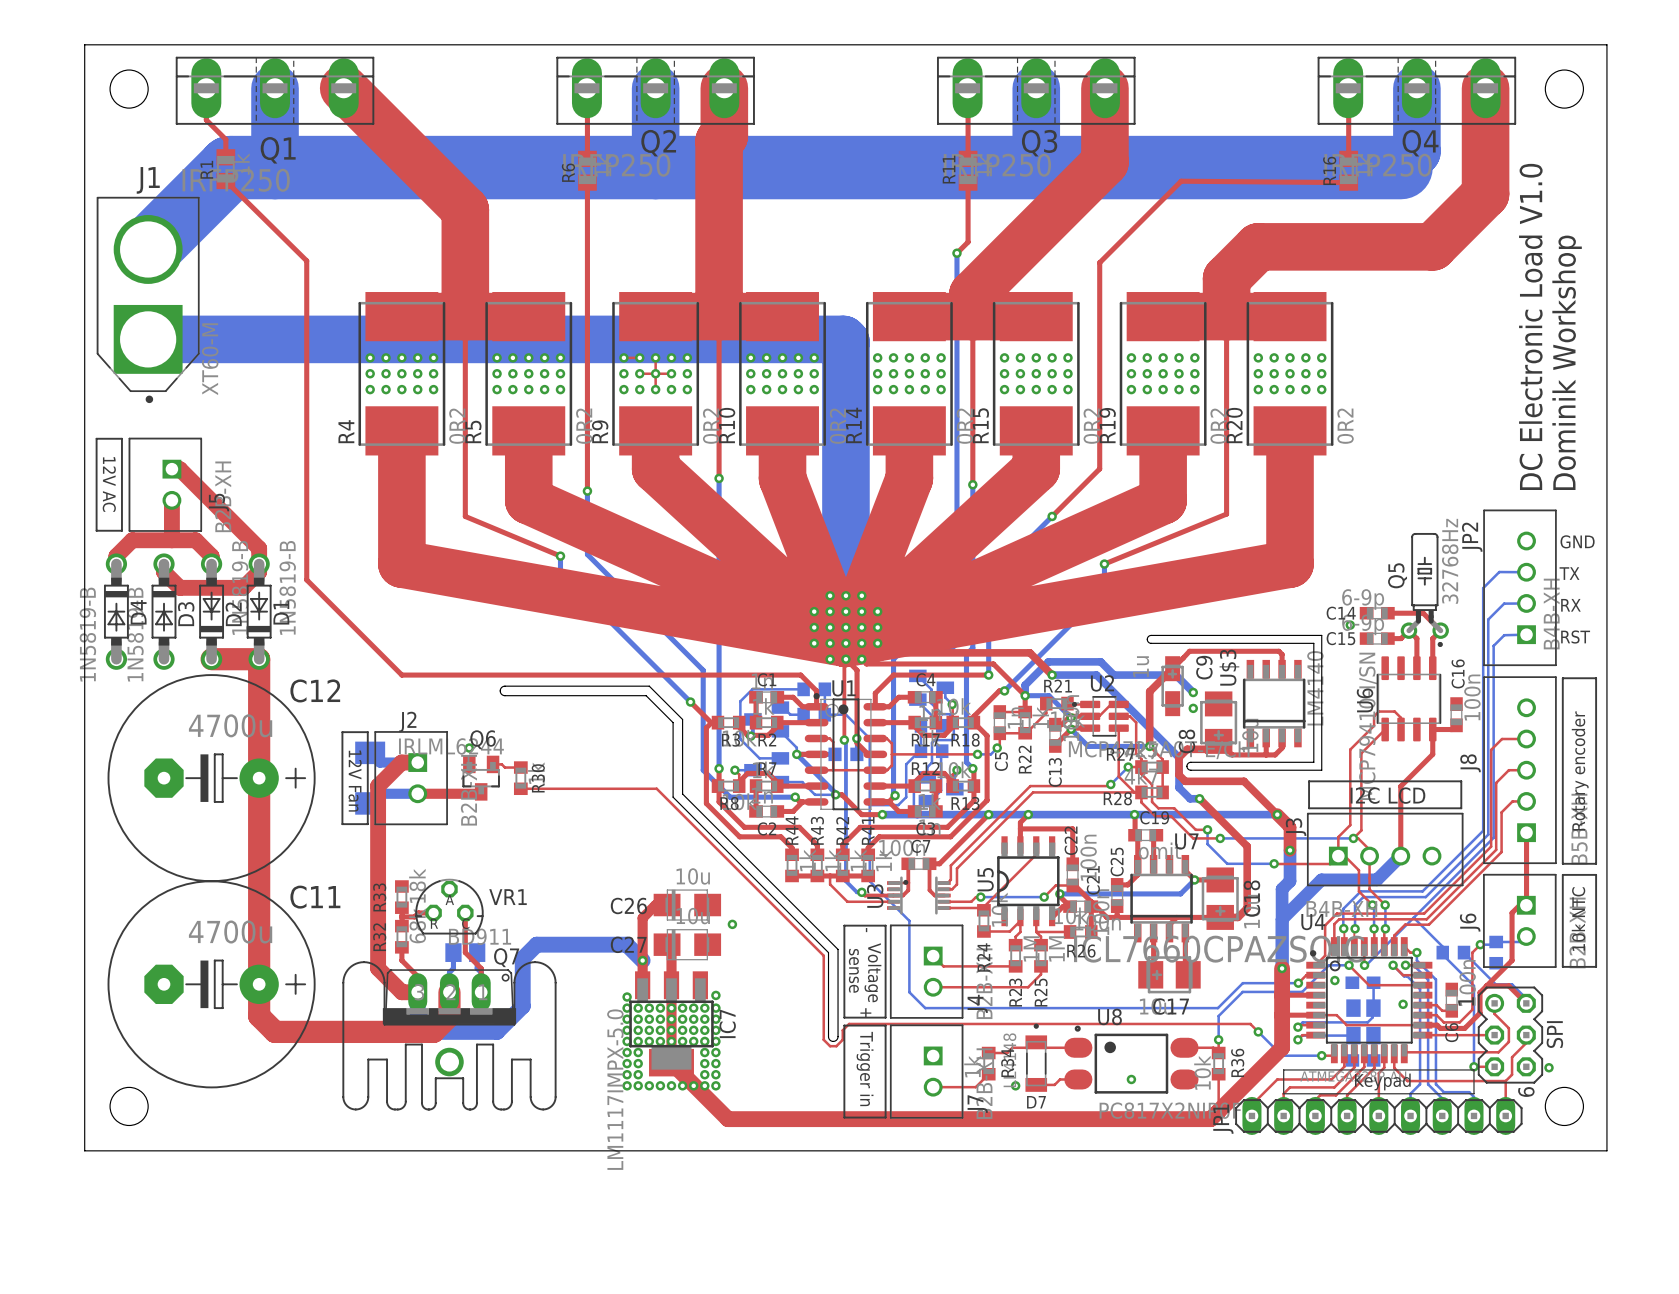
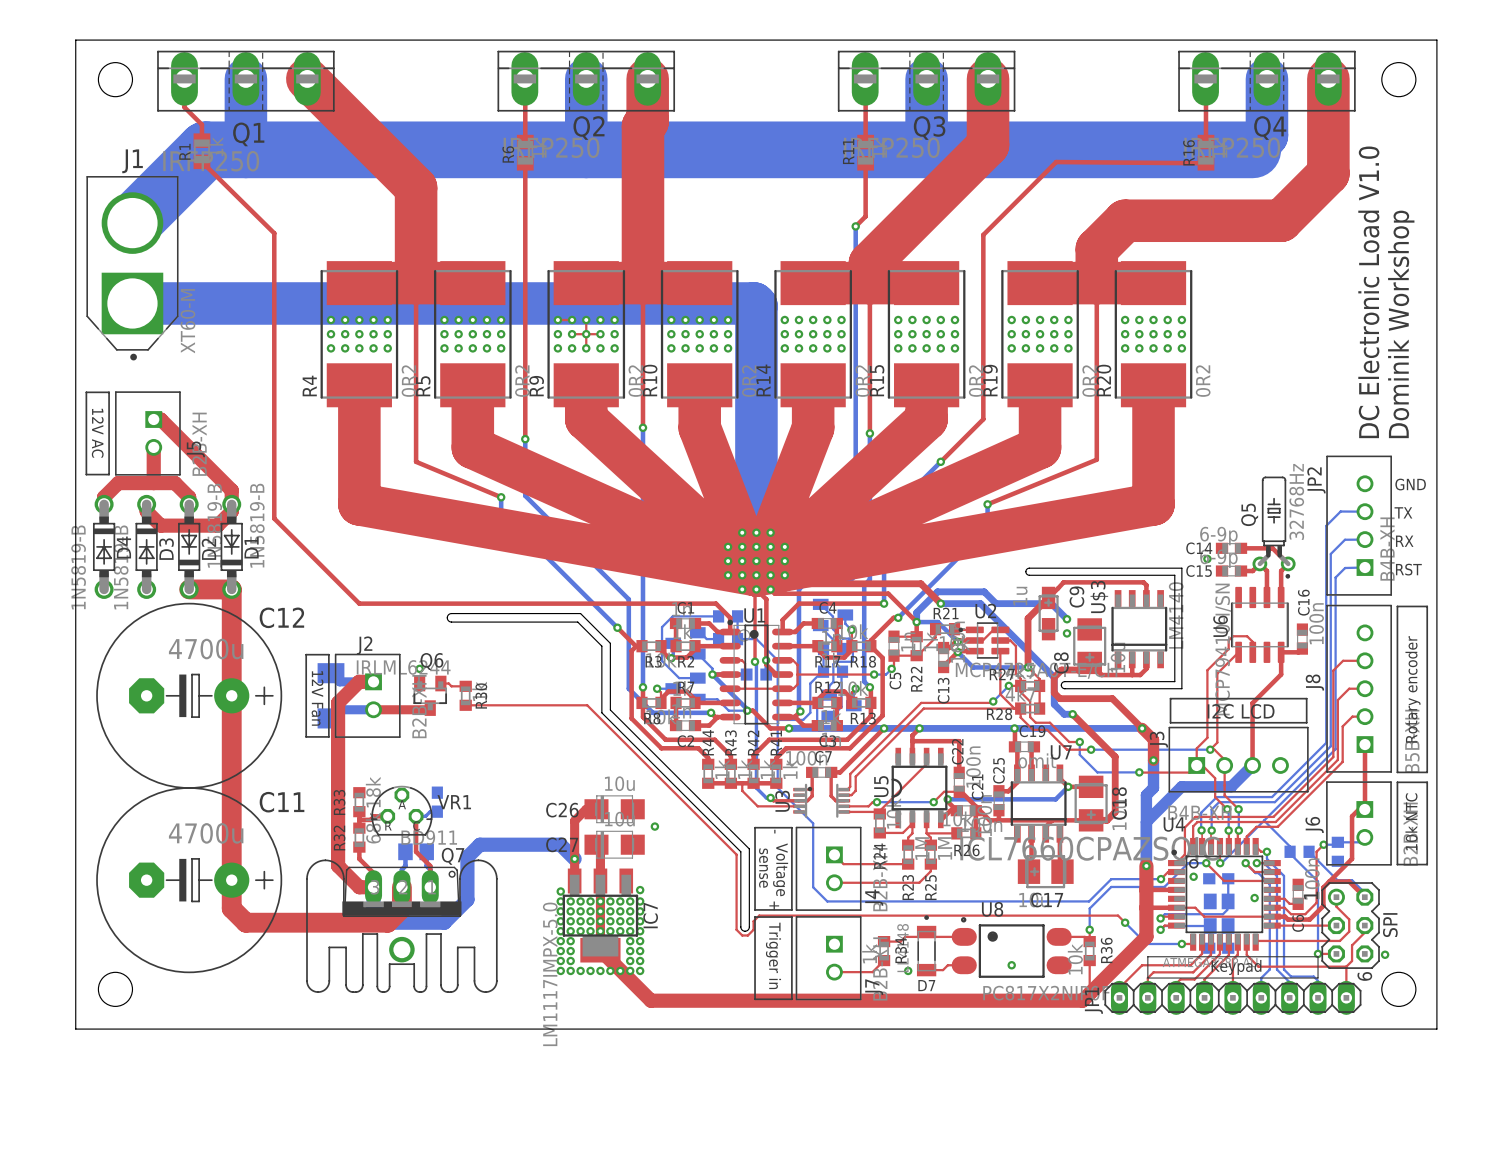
part: none -> (437, 802)
bottom track: none -> (437, 811) (430, 811) (425, 816) (416, 816)

